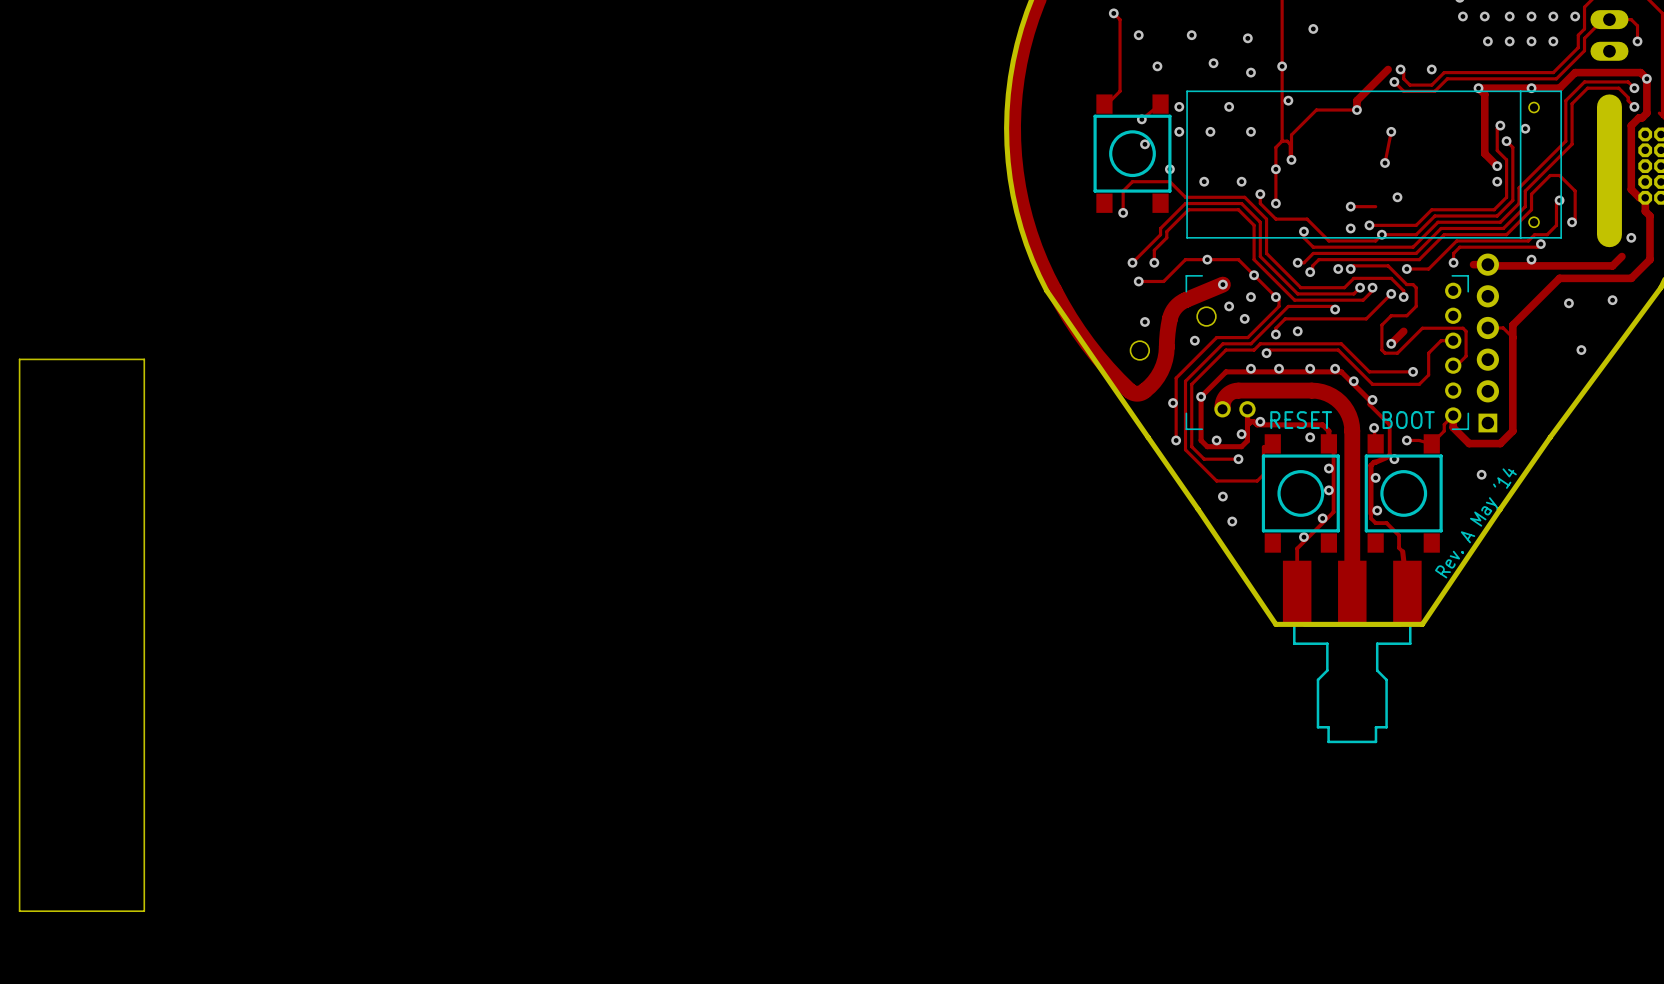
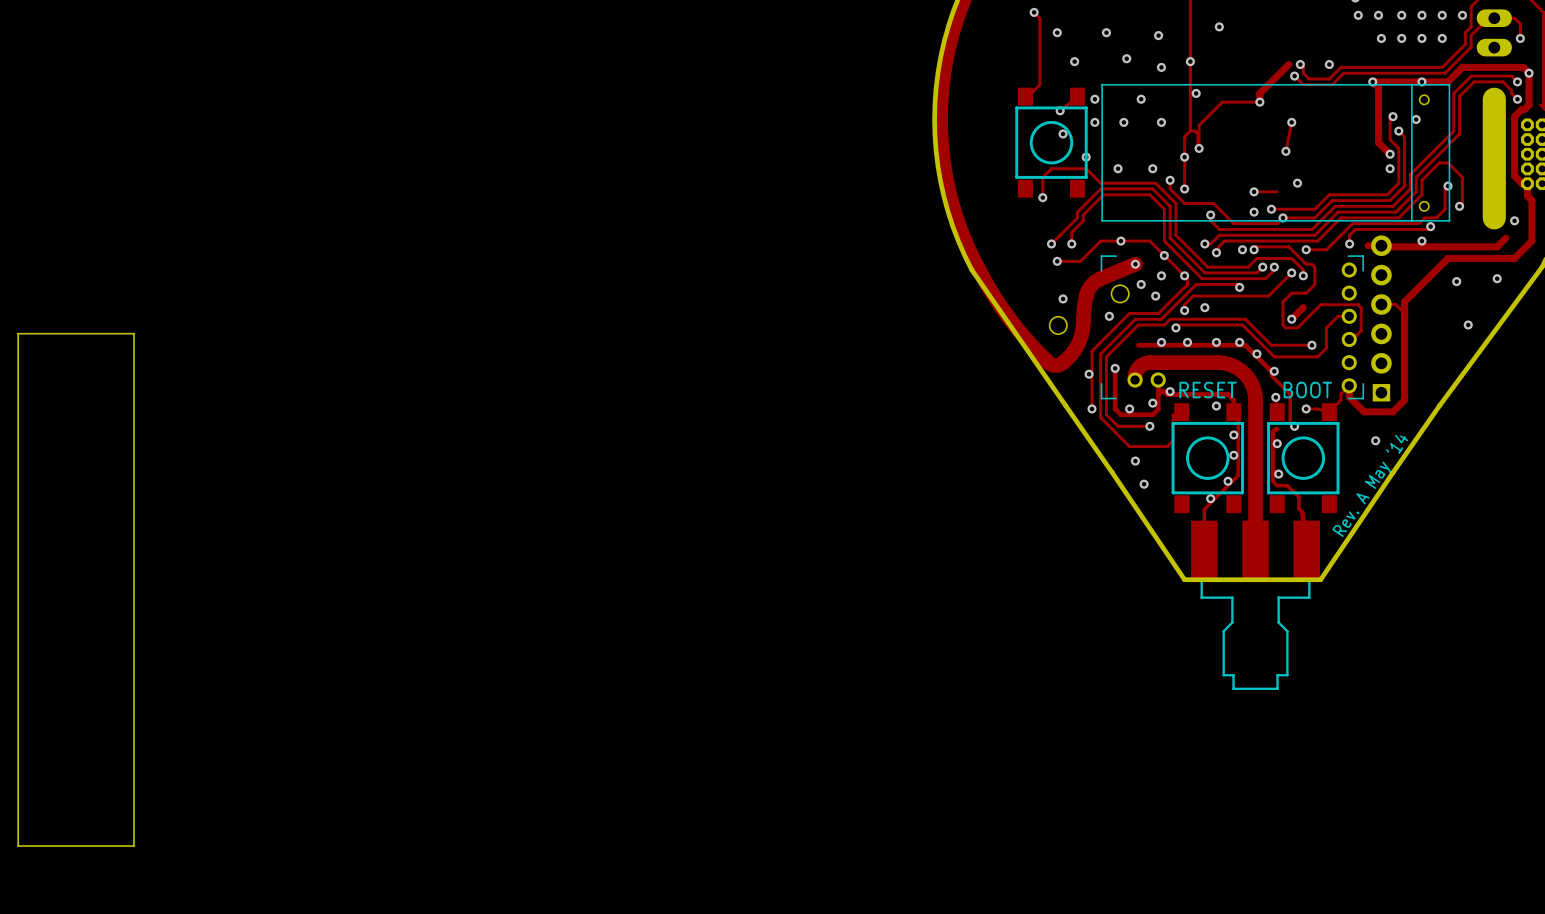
track: (1226, 371) (1201, 396) (1201, 399) -> none
track: (1389, 454) (1375, 462) -> none

